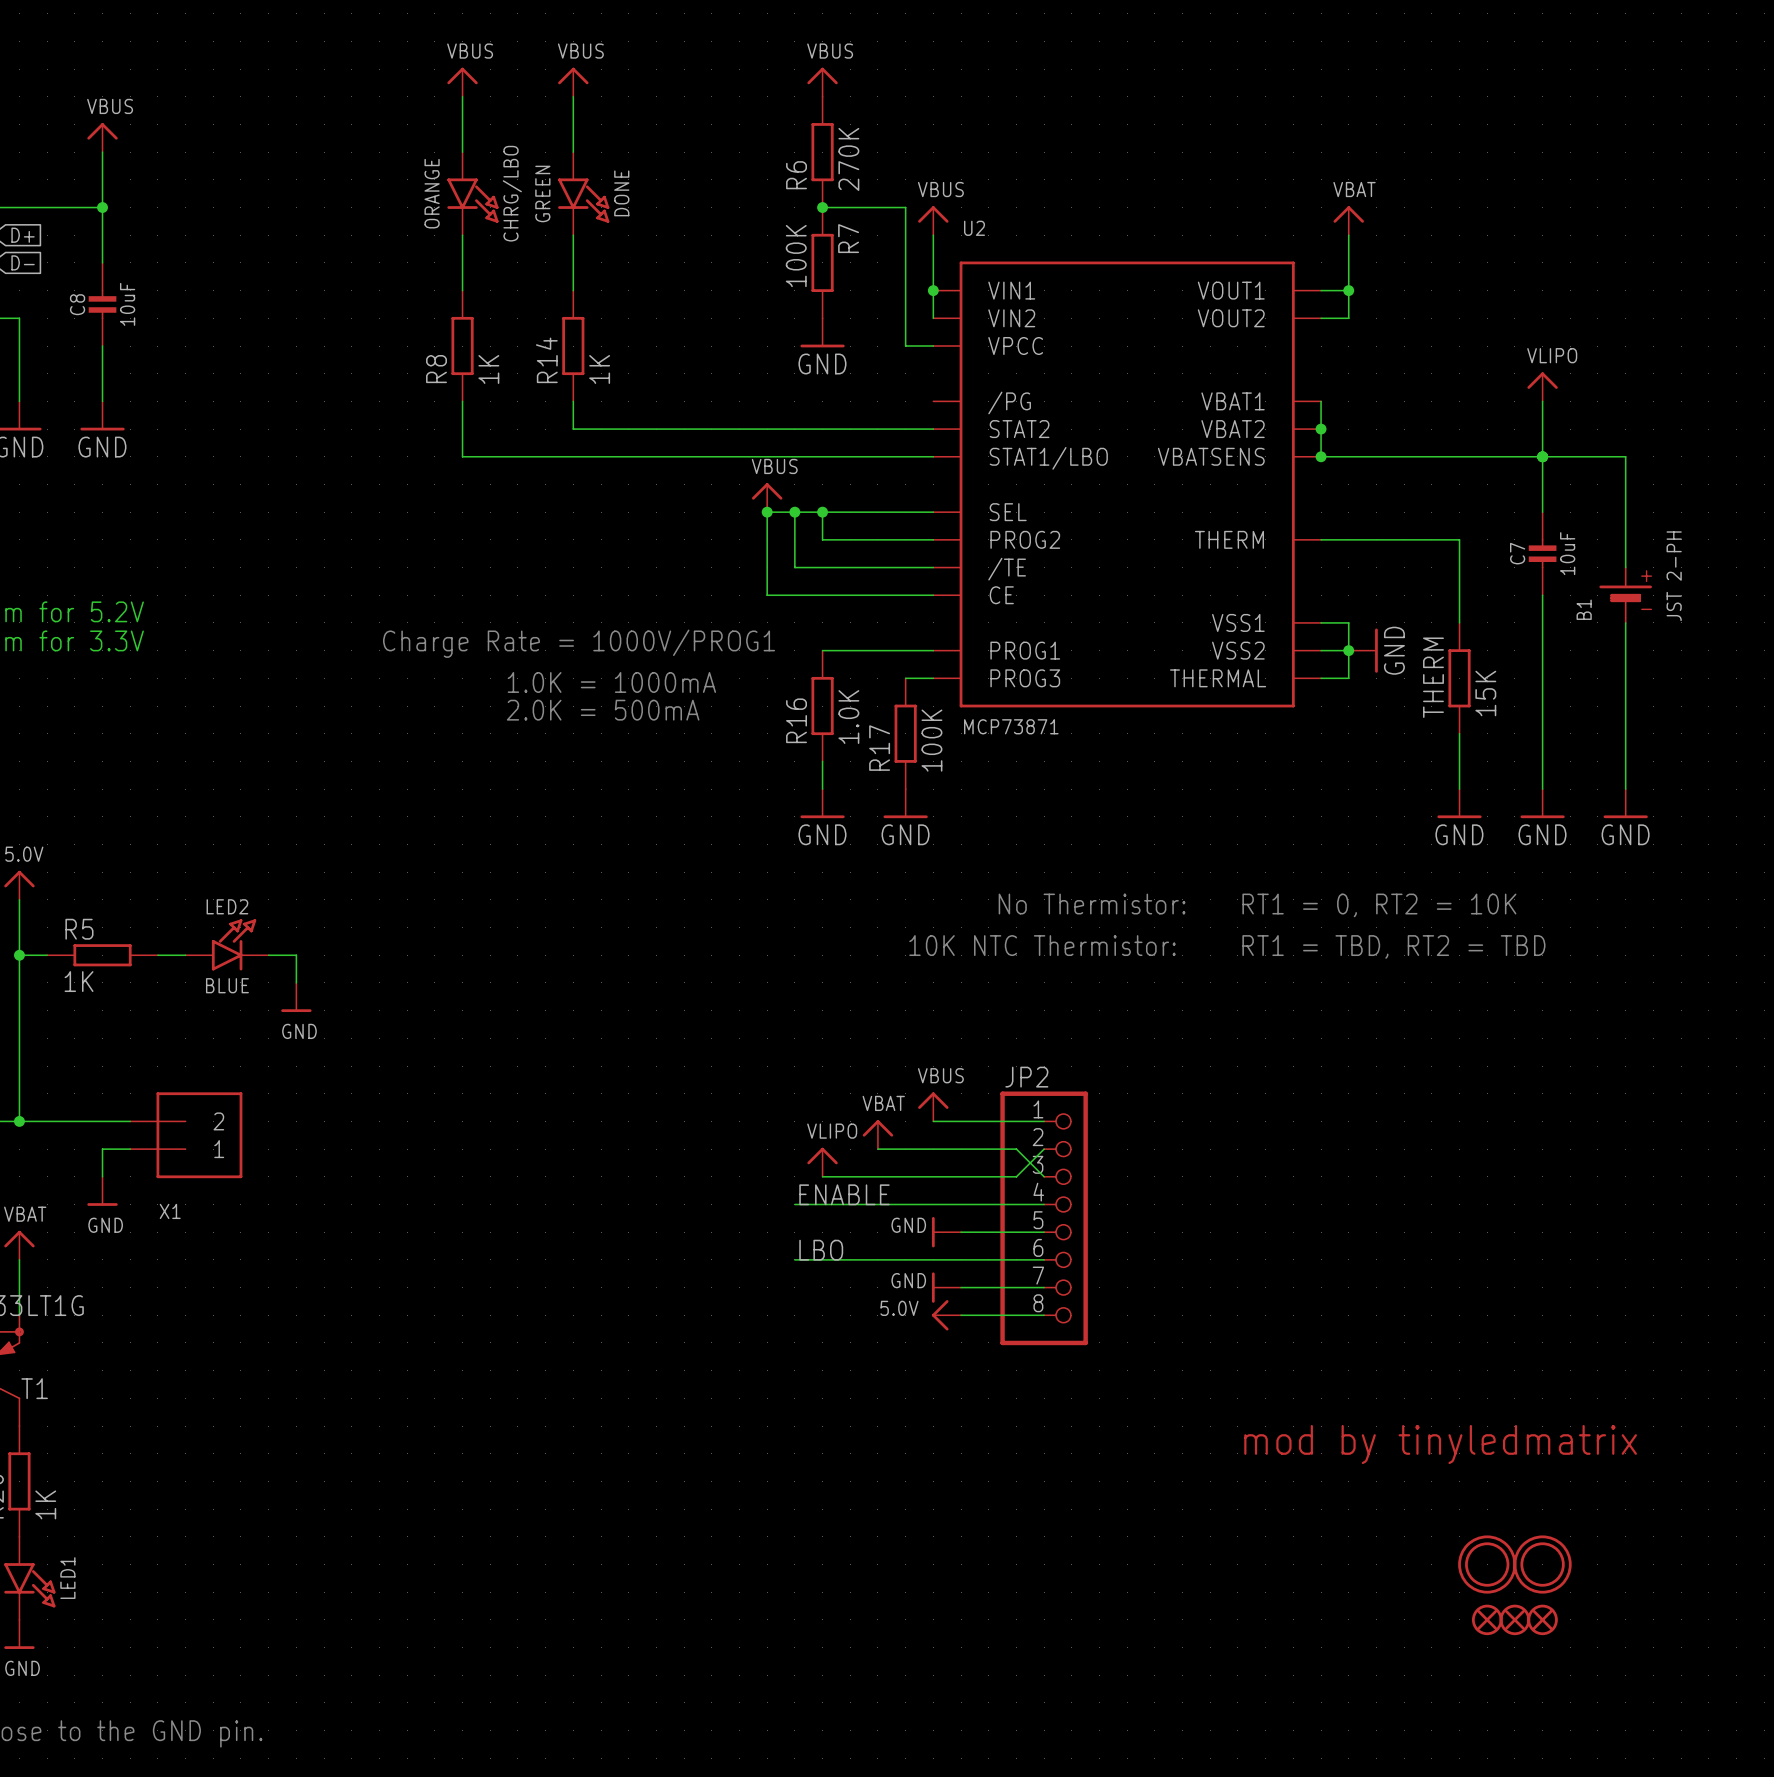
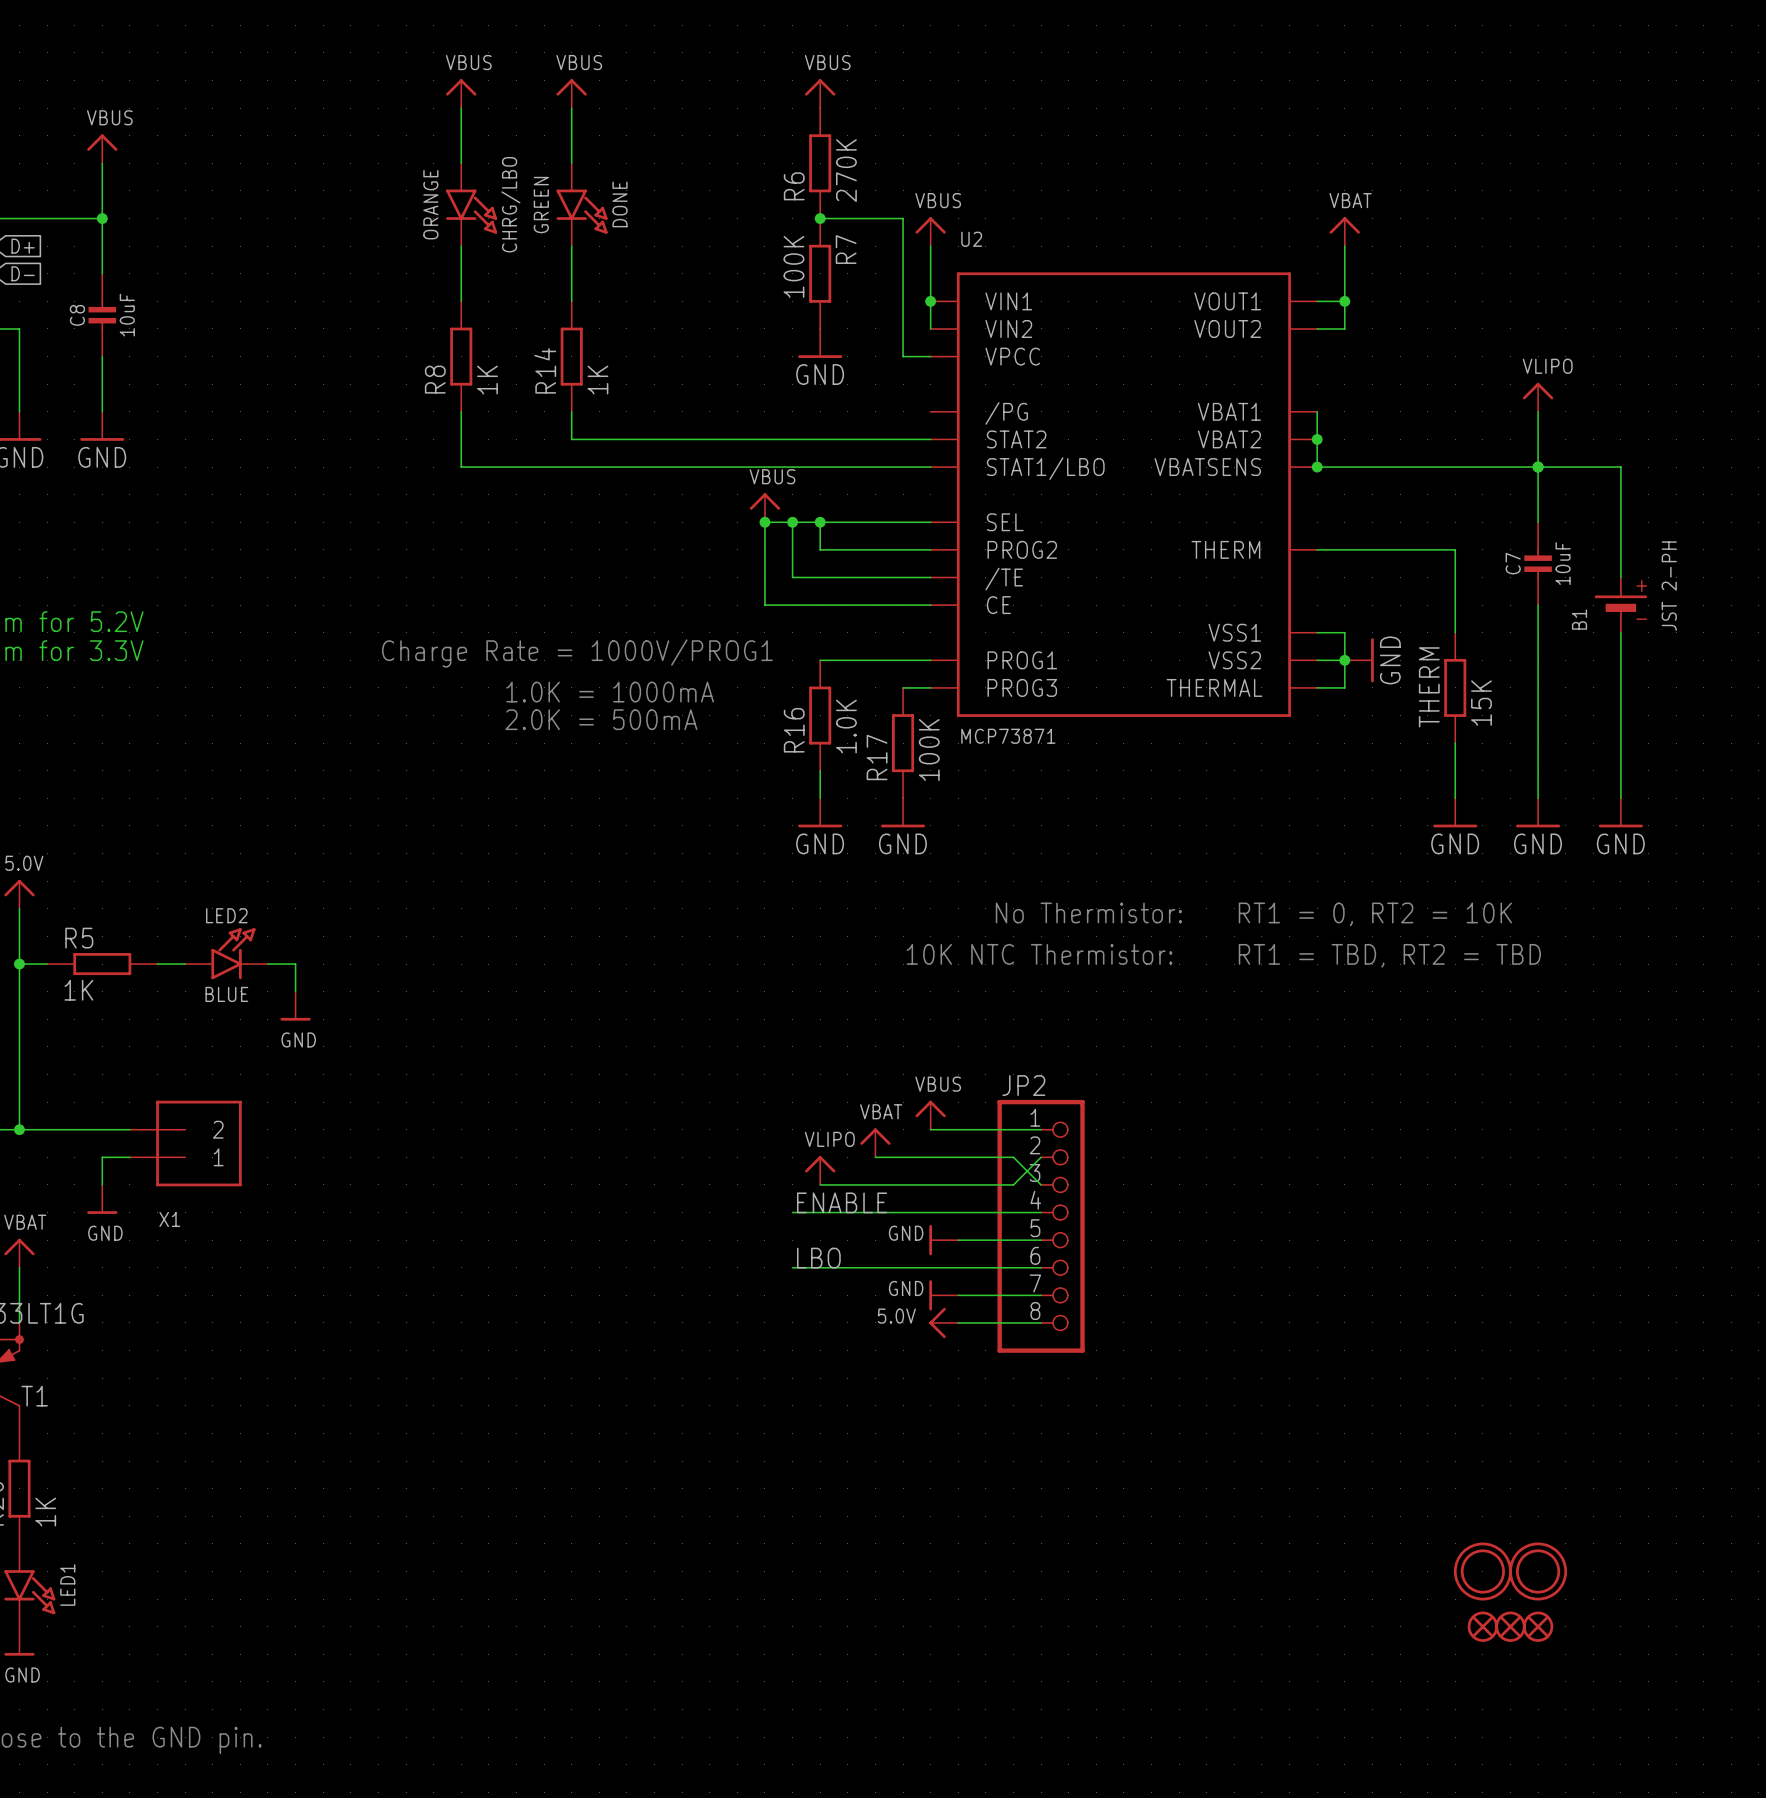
text: mod by tinyledmatrix (1440, 1444) -> none

